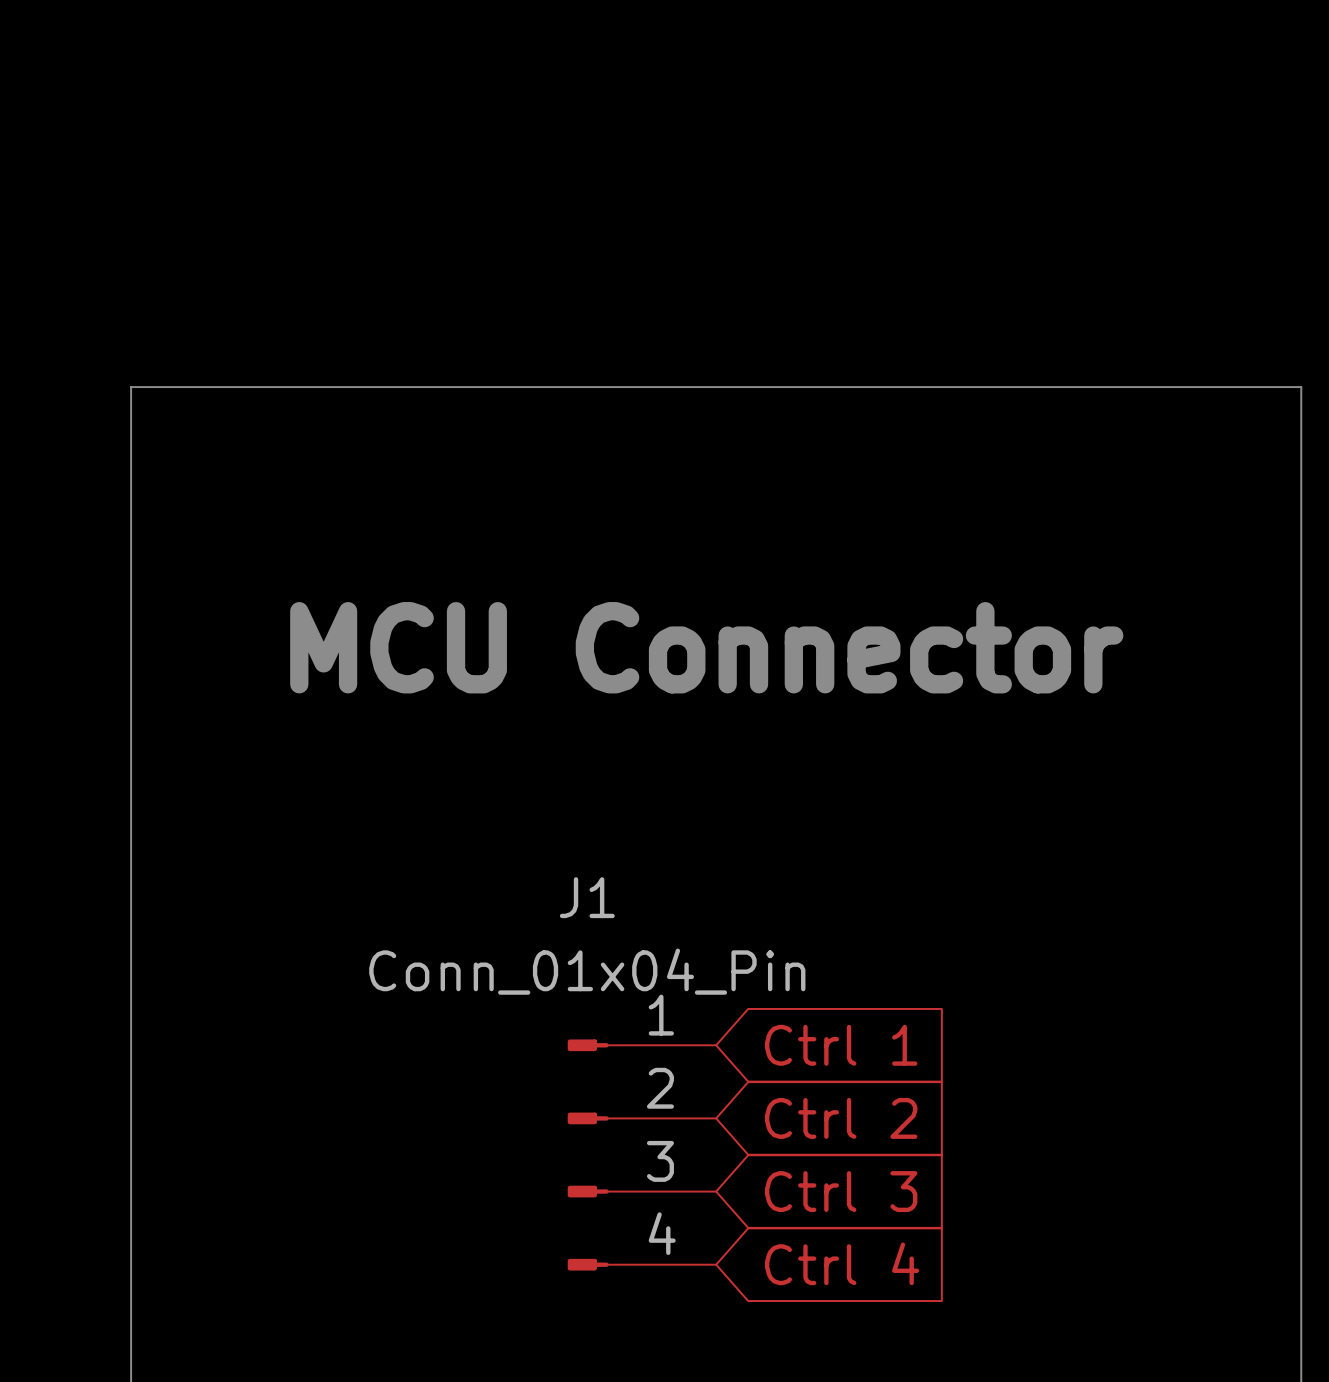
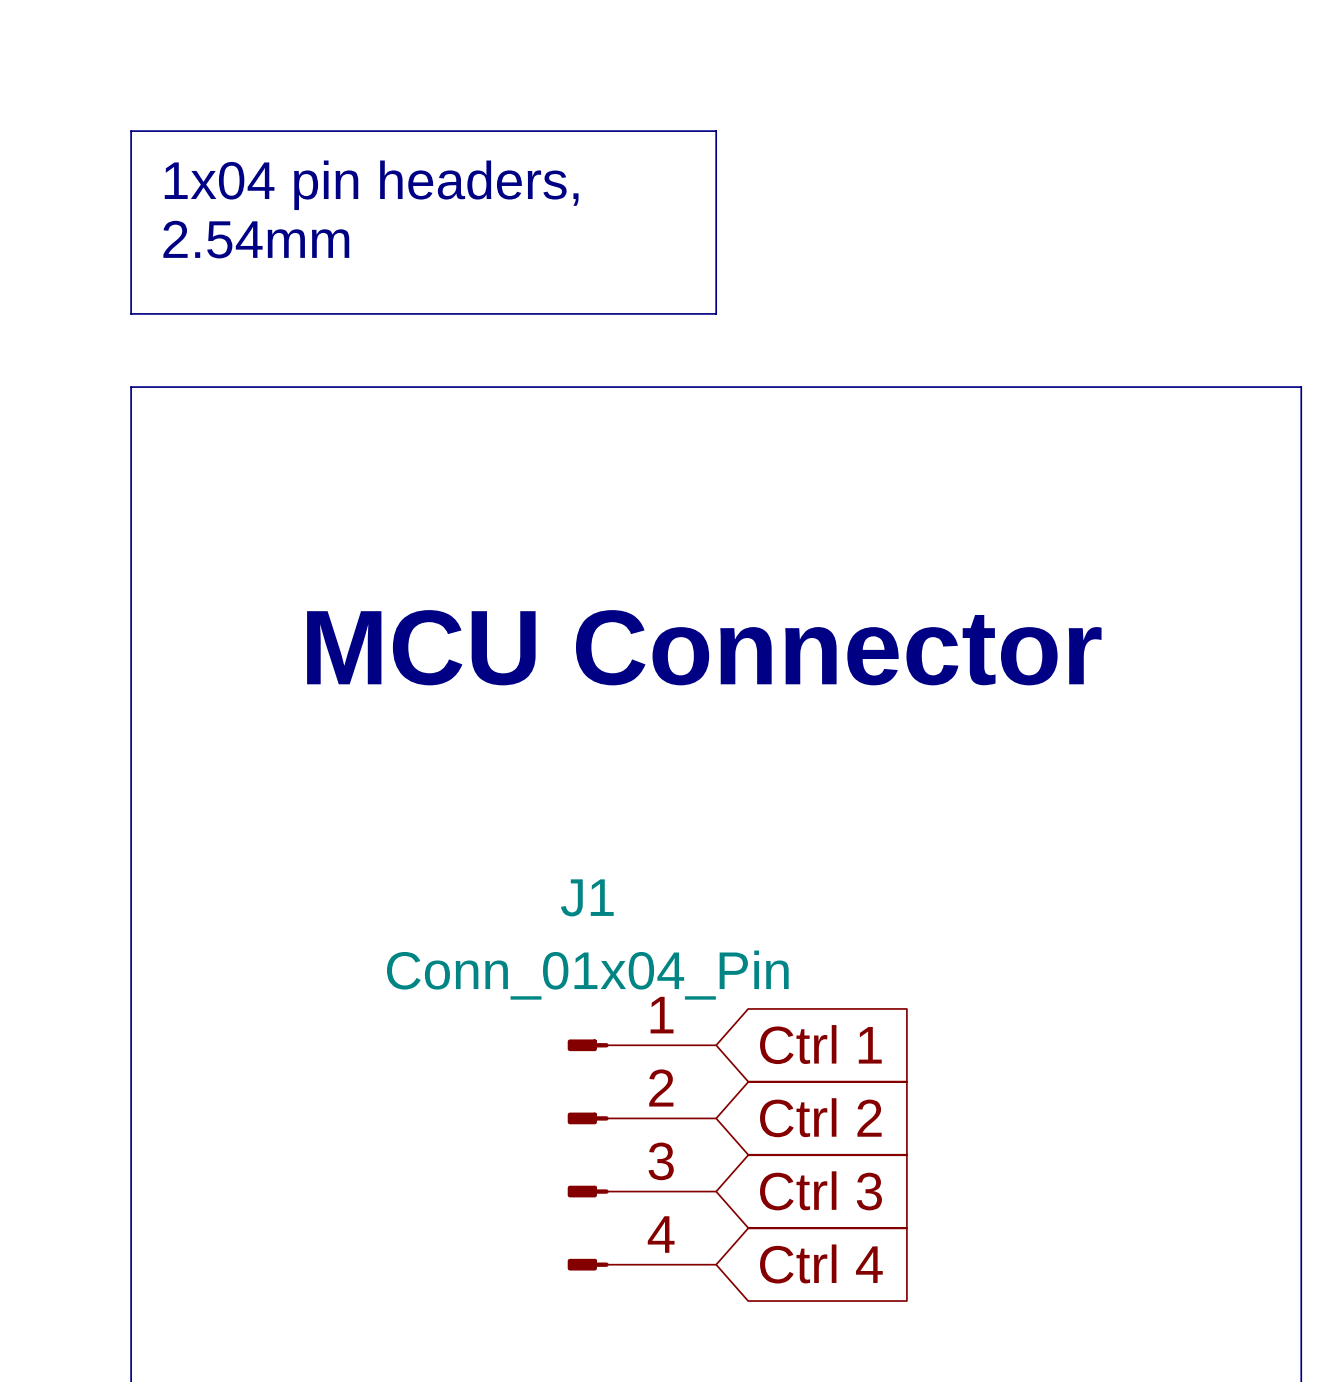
line: none -> (131, 131) (716, 131) (716, 313) (131, 313) (131, 131)
text: none -> 1x04 pin headers, (371, 185)
text: none -> 2.54mm (256, 239)

